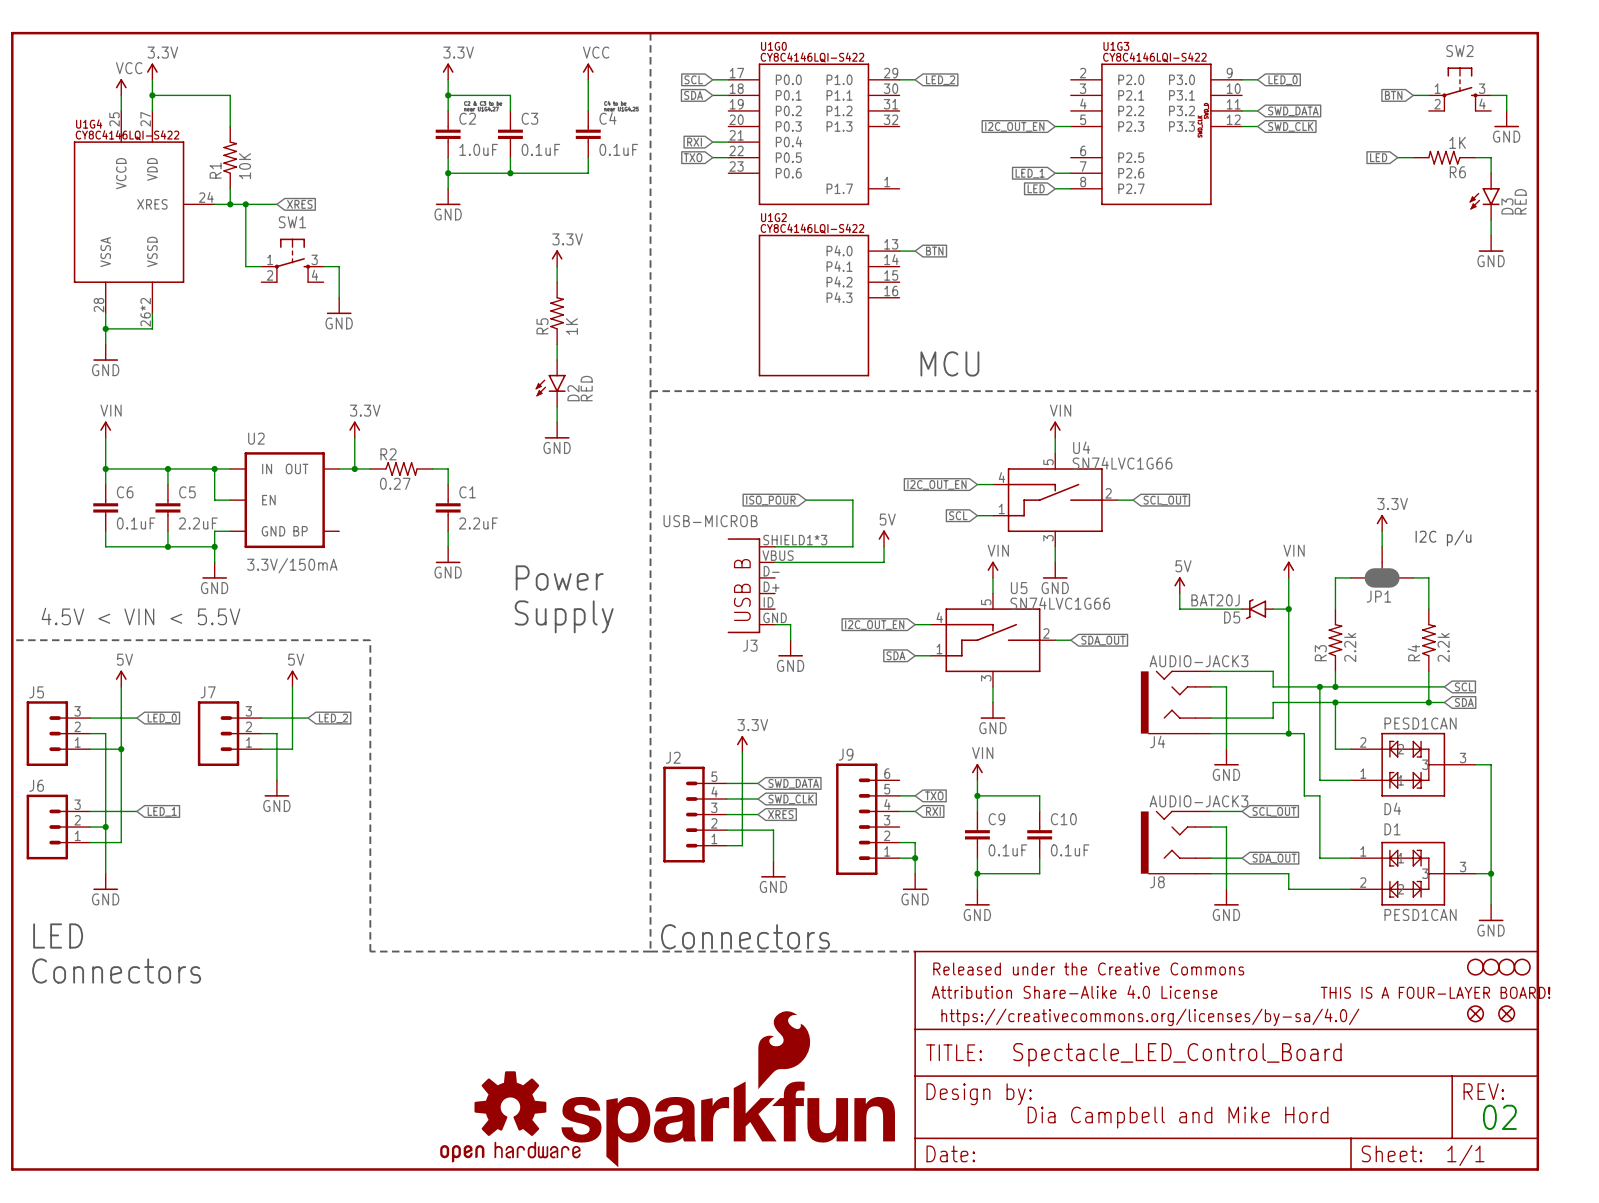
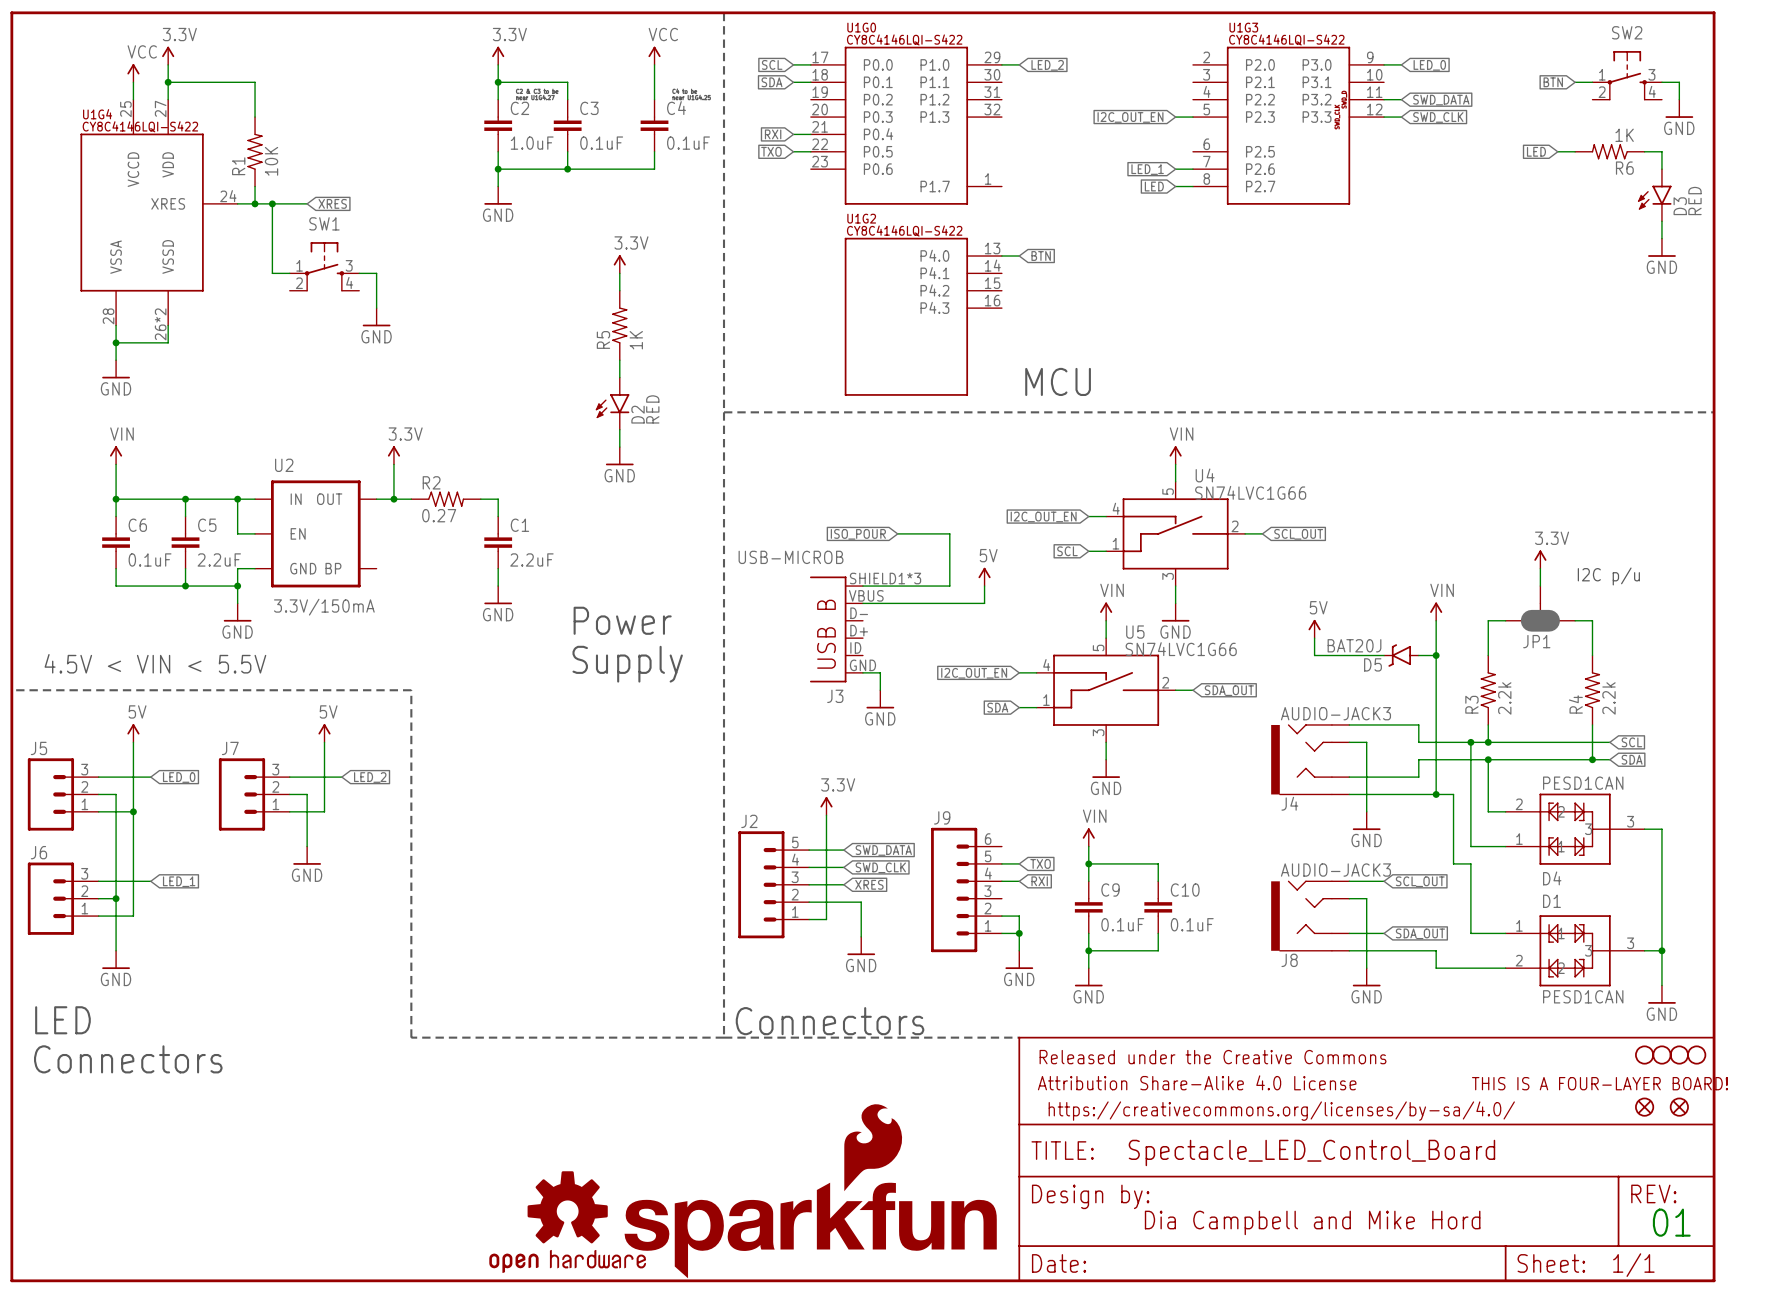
text: 02 (1499, 1117) -> 01 (1671, 1222)

